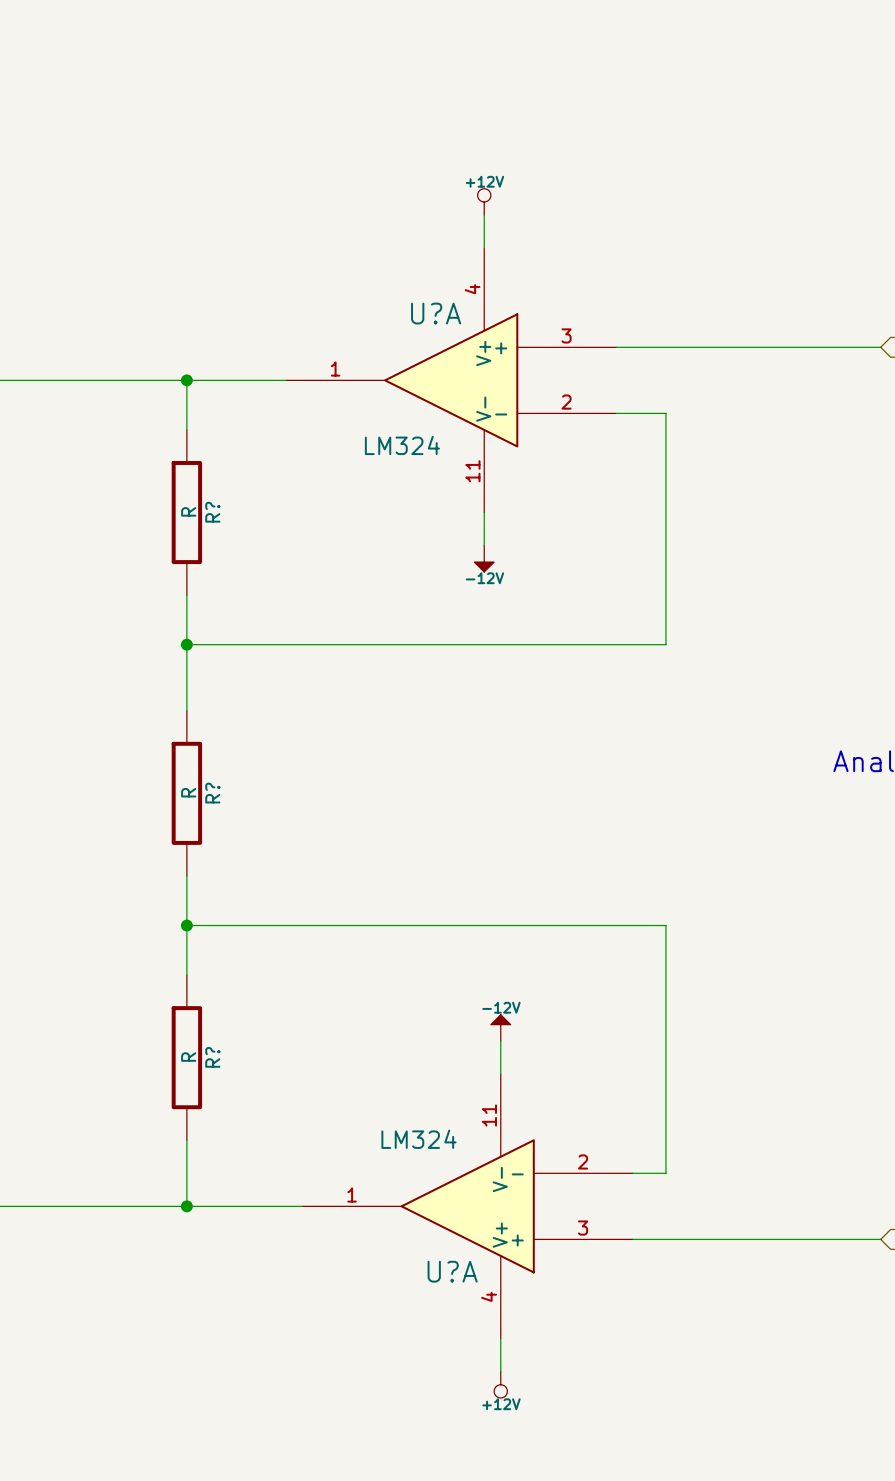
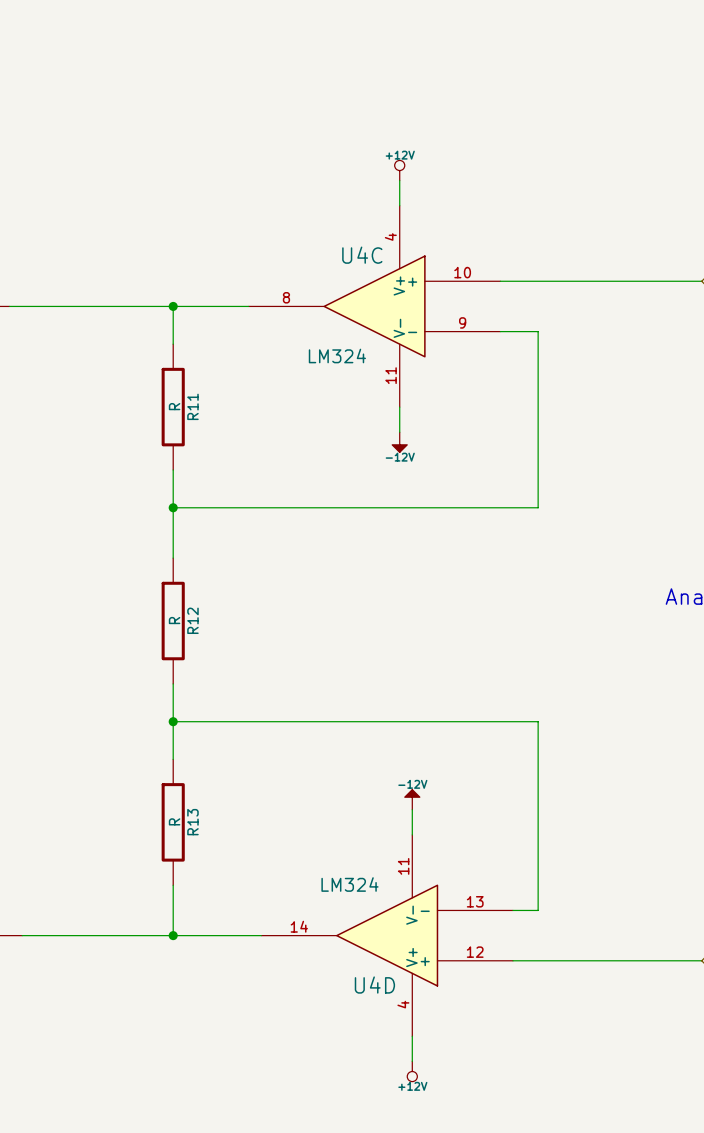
U?A name: U?A (436, 313) -> U4C (362, 255)
U?A pin number: 3 (566, 335) -> 10 (462, 272)
U?A pin number: 1 (335, 369) -> 8 (286, 297)
U?A pin number: 2 (566, 402) -> 9 (462, 322)
R? name: R? (212, 512) -> R11 (192, 406)
R? name: R? (212, 793) -> R12 (192, 620)
R? name: R? (212, 1057) -> R13 (192, 822)
U?A pin number: 2 (583, 1161) -> 13 (475, 901)
U?A pin number: 1 (352, 1194) -> 14 (299, 926)
U?A pin number: 3 (583, 1228) -> 12 (475, 952)
U?A name: U?A (452, 1271) -> U4D (374, 985)

